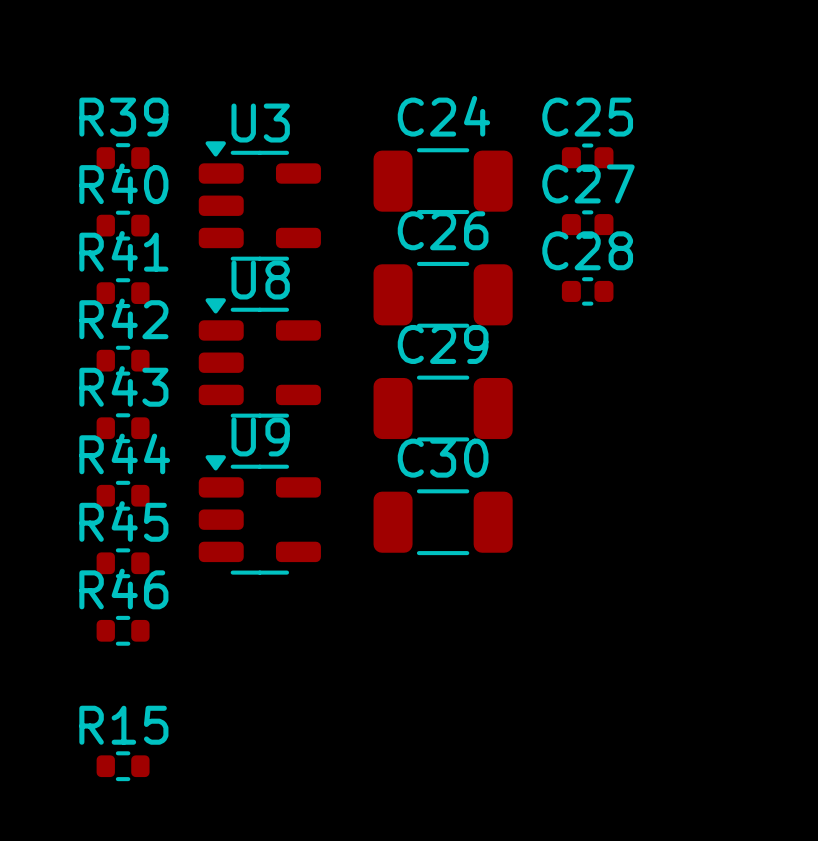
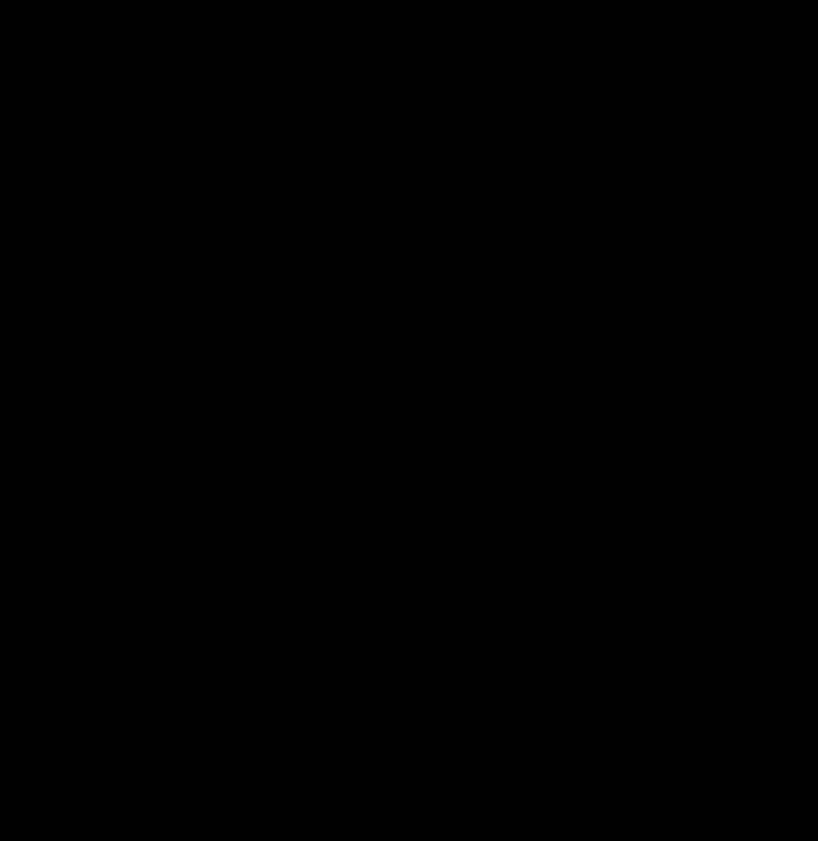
C25: (587, 157) -> none
R39: (123, 158) -> none
C24: (443, 181) -> none
U3: (259, 200) -> none
C27: (587, 224) -> none
R40: (123, 225) -> none
C28: (587, 291) -> none
R41: (123, 293) -> none
C26: (443, 294) -> none
U8: (259, 357) -> none
R42: (123, 360) -> none
C29: (443, 408) -> none
R43: (123, 428) -> none
R44: (123, 495) -> none
U9: (259, 514) -> none
C30: (443, 522) -> none
R45: (123, 563) -> none
R46: (123, 630) -> none
R15: (123, 766) -> none

